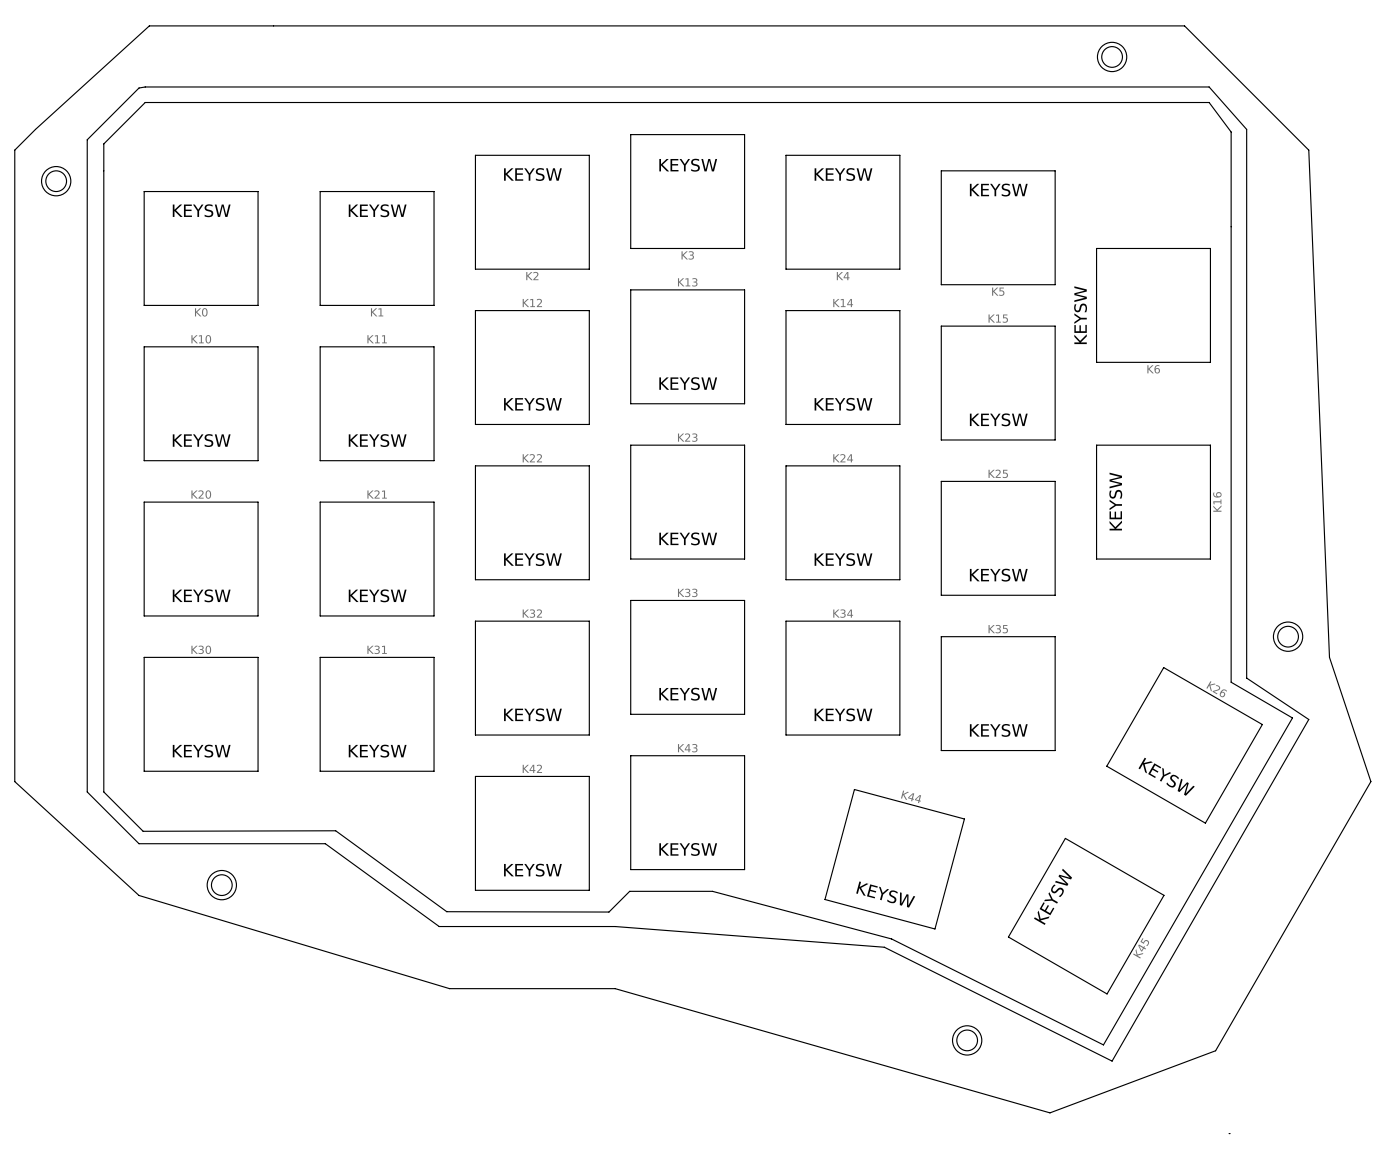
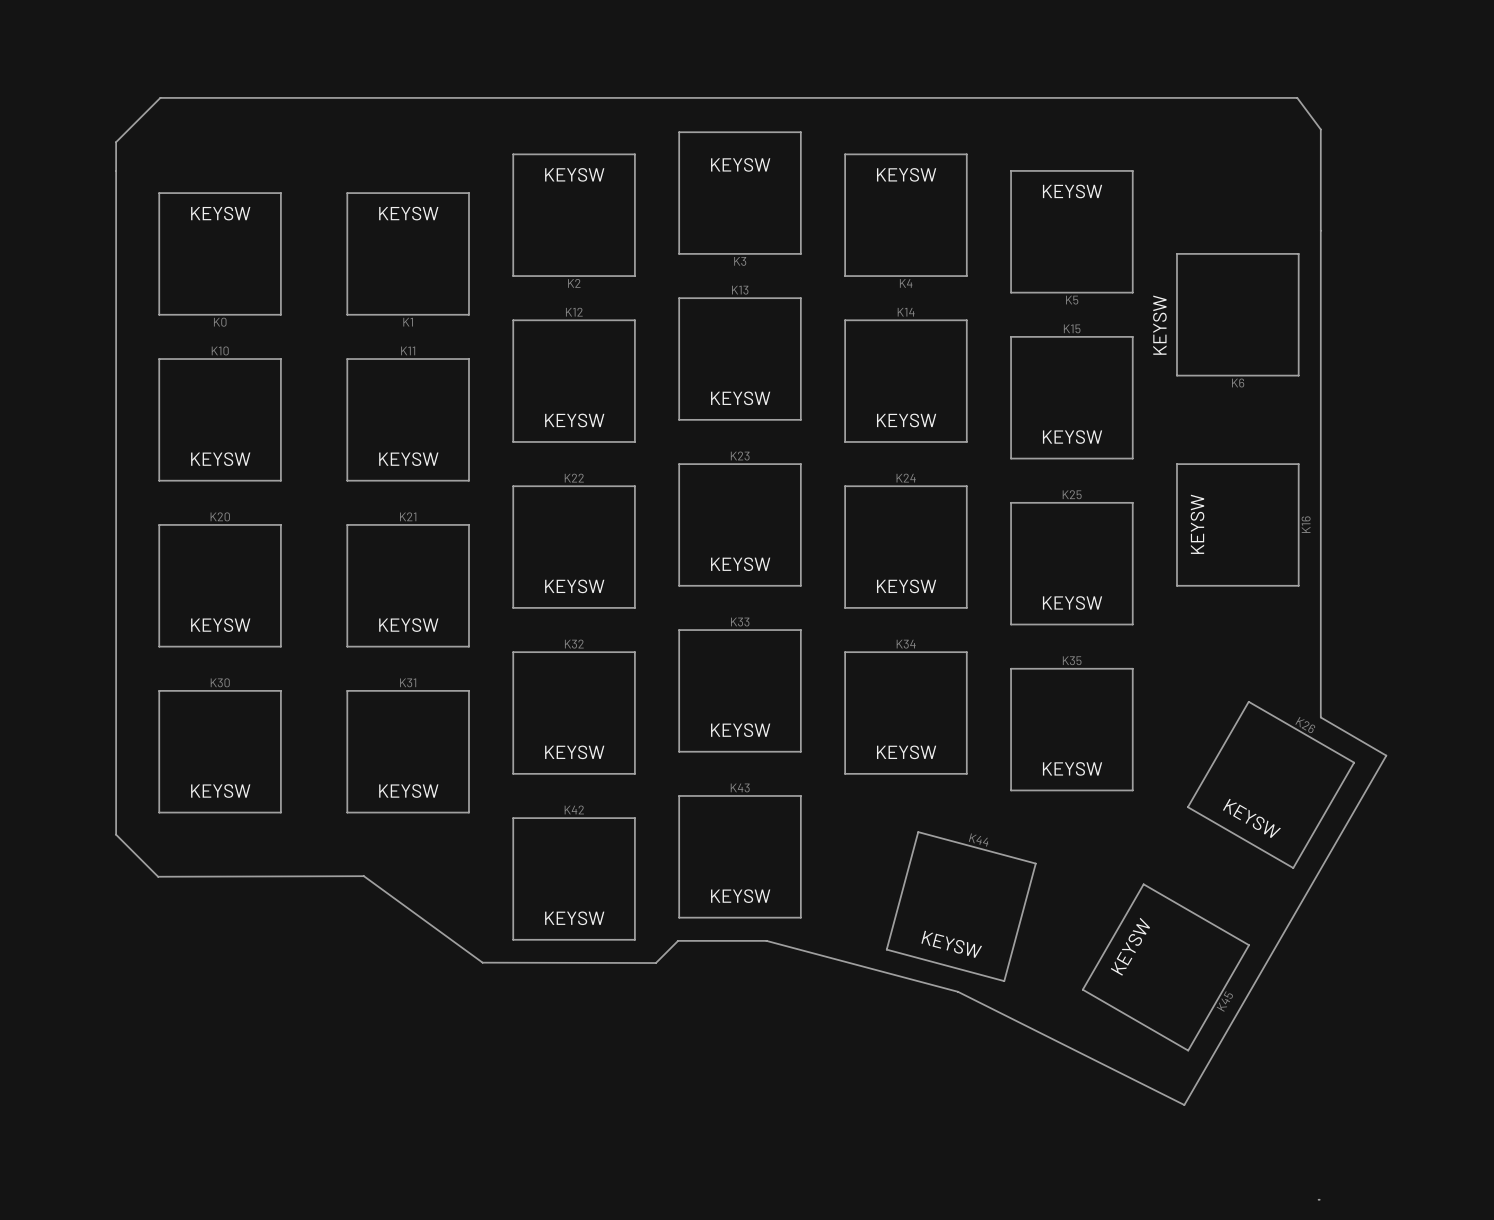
board edge: (149, 25) (14, 150) (14, 781) (138, 895) (449, 988) (615, 988) (1049, 1112) (1215, 1050) (1370, 781) (1329, 657) (1308, 150) (1184, 25) (149, 25) -> none
round board edge: [1097, 41, 1128, 73] -> none
round board edge: [1101, 46, 1123, 68] -> none
board edge: (145, 86) (138, 88) (87, 139) (87, 791) (138, 843) (325, 843) (439, 926) (615, 926) (884, 947) (1112, 1061) (1308, 719) (1246, 678) (1246, 129) (1209, 86) (145, 86) -> none
round board edge: [41, 166, 72, 197] -> none
round board edge: [45, 170, 67, 192] -> none
round board edge: [1273, 621, 1304, 652] -> none
round board edge: [1277, 625, 1299, 648] -> none
round board edge: [206, 870, 237, 901] -> none
round board edge: [211, 874, 233, 896] -> none
round board edge: [952, 1025, 983, 1056] -> none
round board edge: [956, 1029, 978, 1052] -> none

